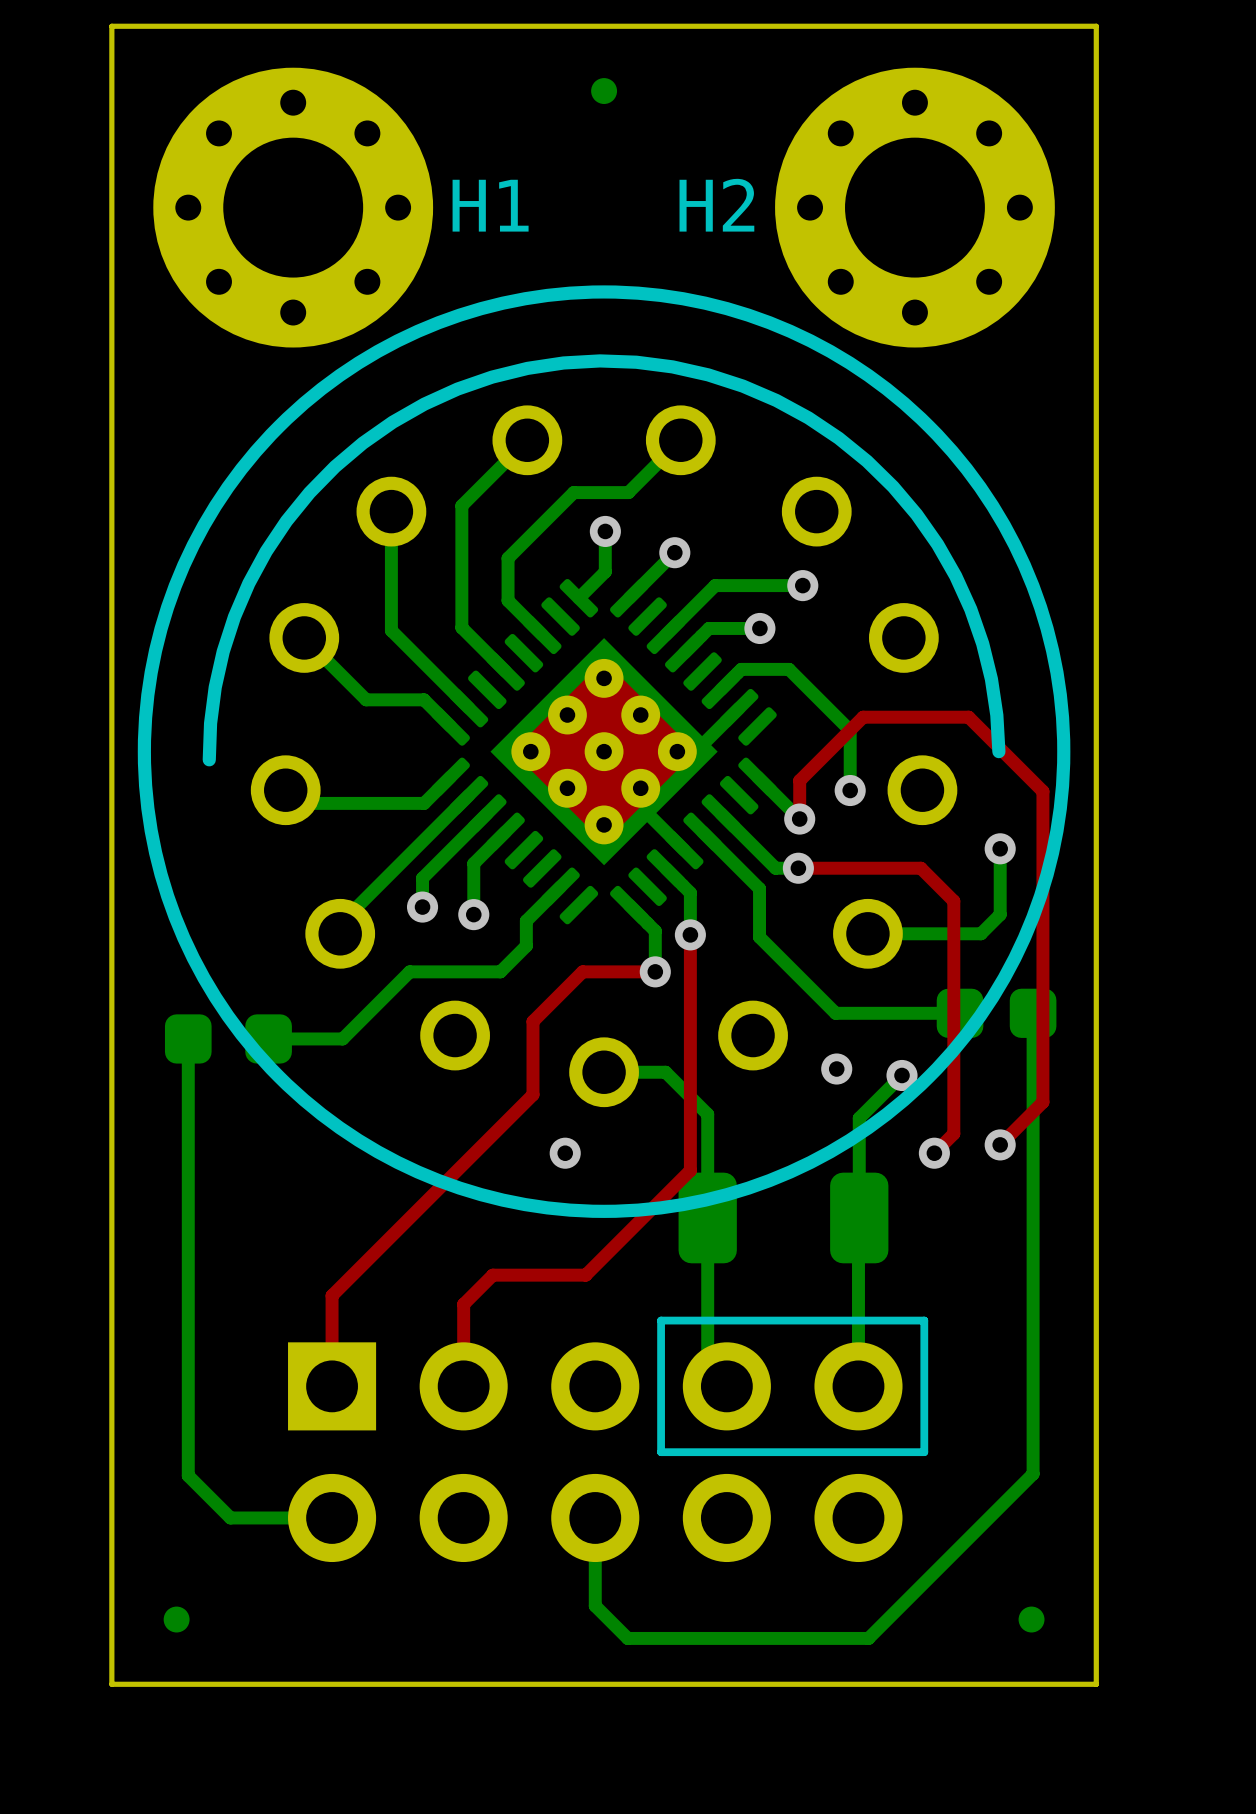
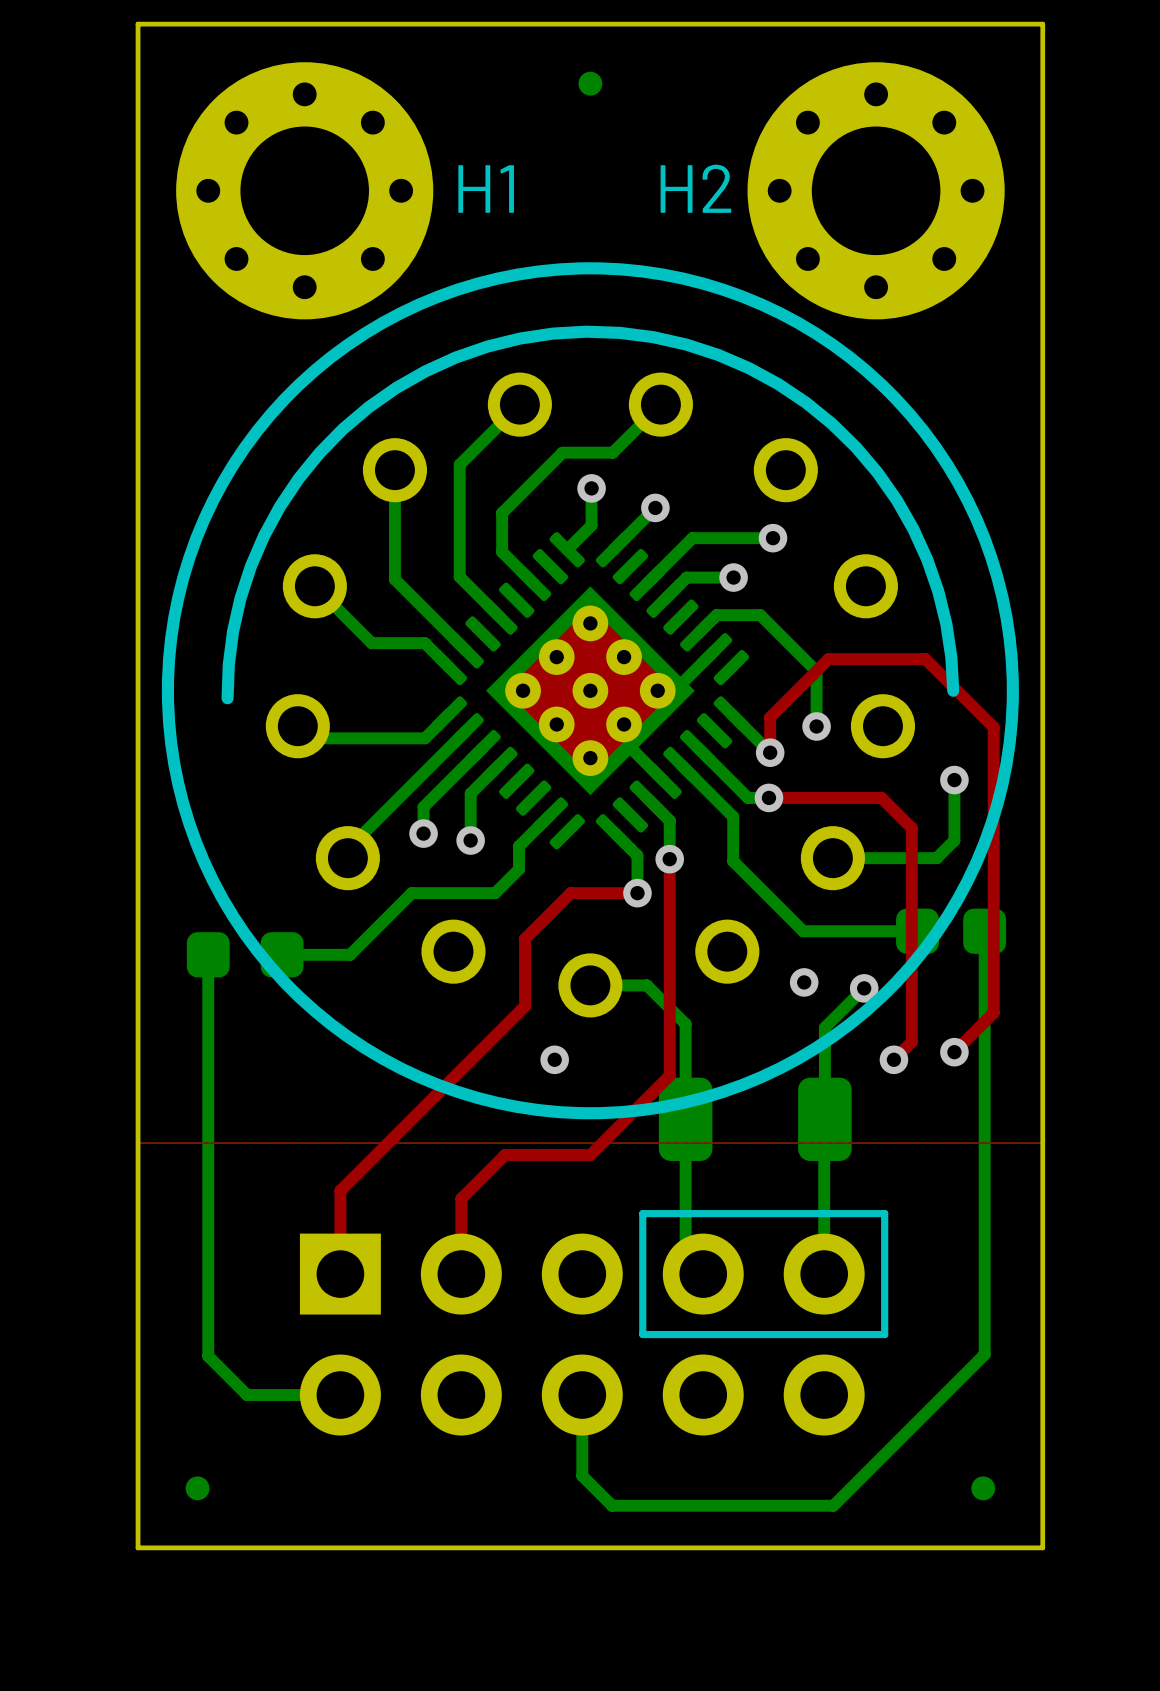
top zone outline: none -> (138, 1143) (1042, 1143)
top track: (604, 1256) (585, 1275) (492, 1275) -> (590, 1155) (505, 1155) (488, 1171)

